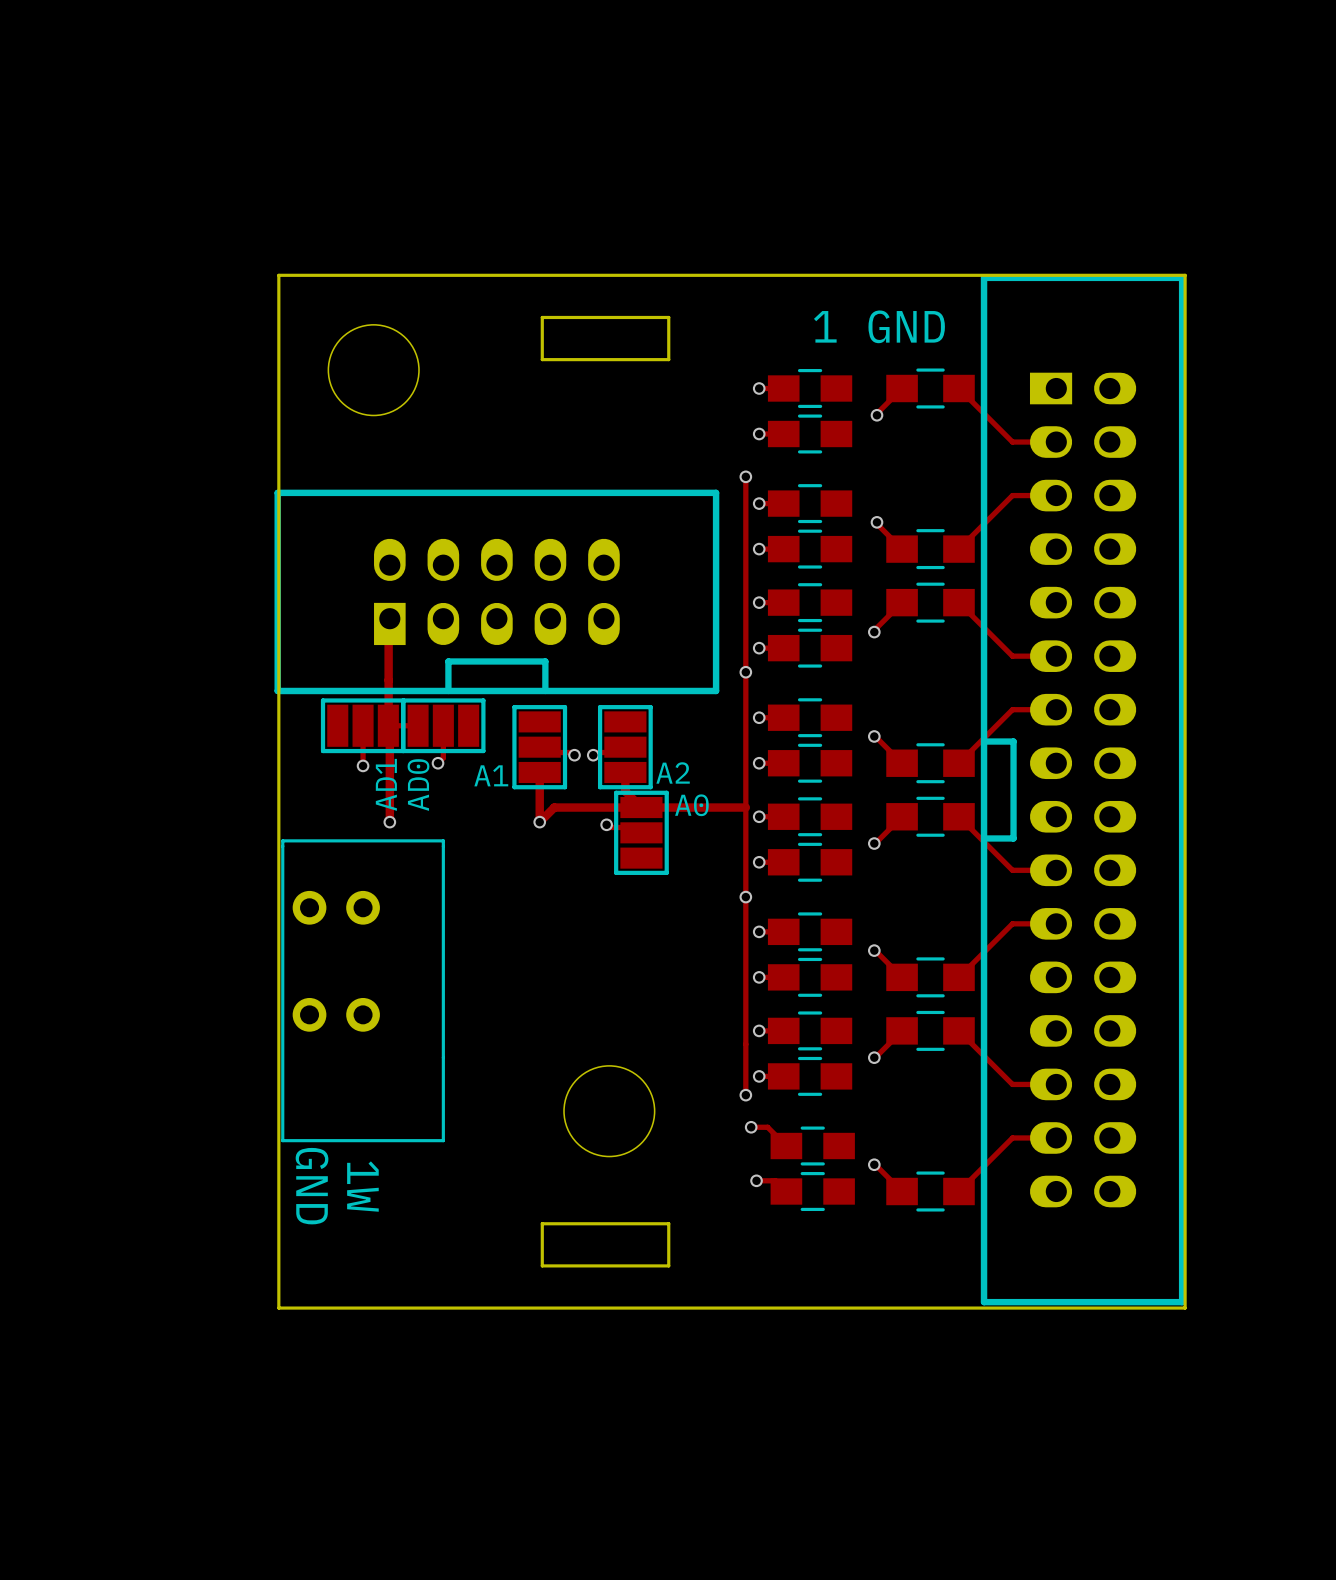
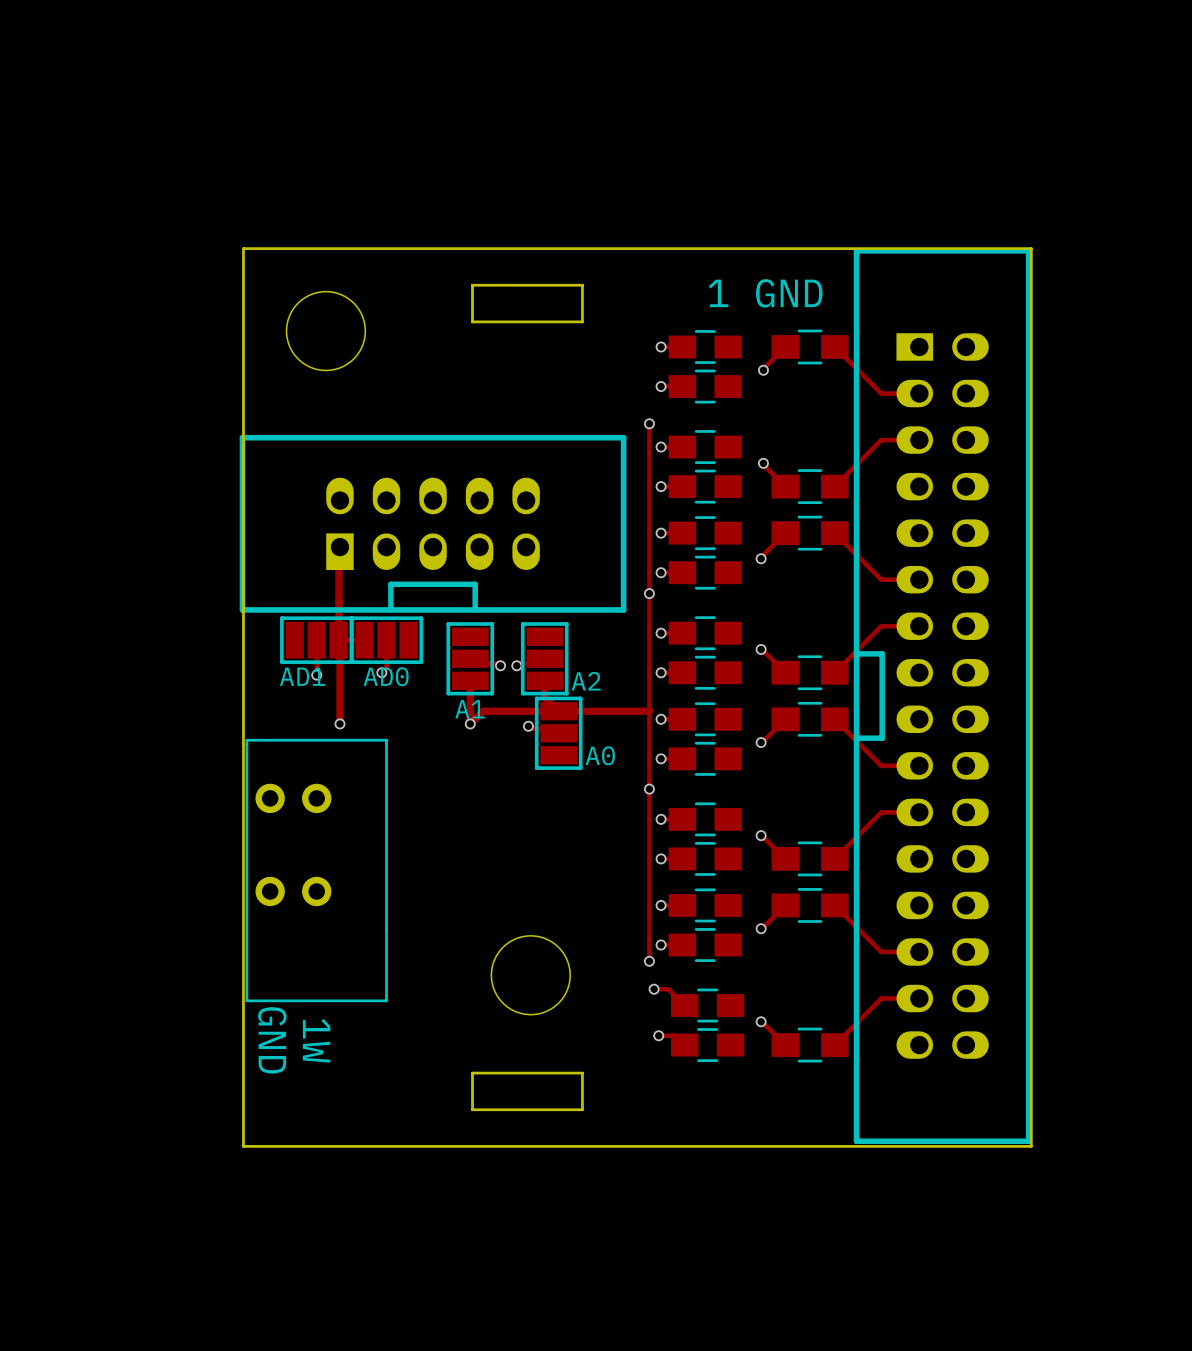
part value position: A1 (491, 775) -> A1 (470, 709)
part value rotation: 0° (386, 784) -> 90° clockwise (302, 676)
part value rotation: 0° (418, 785) -> 90° clockwise (386, 676)
part value position: A0 (691, 805) -> A0 (600, 755)

